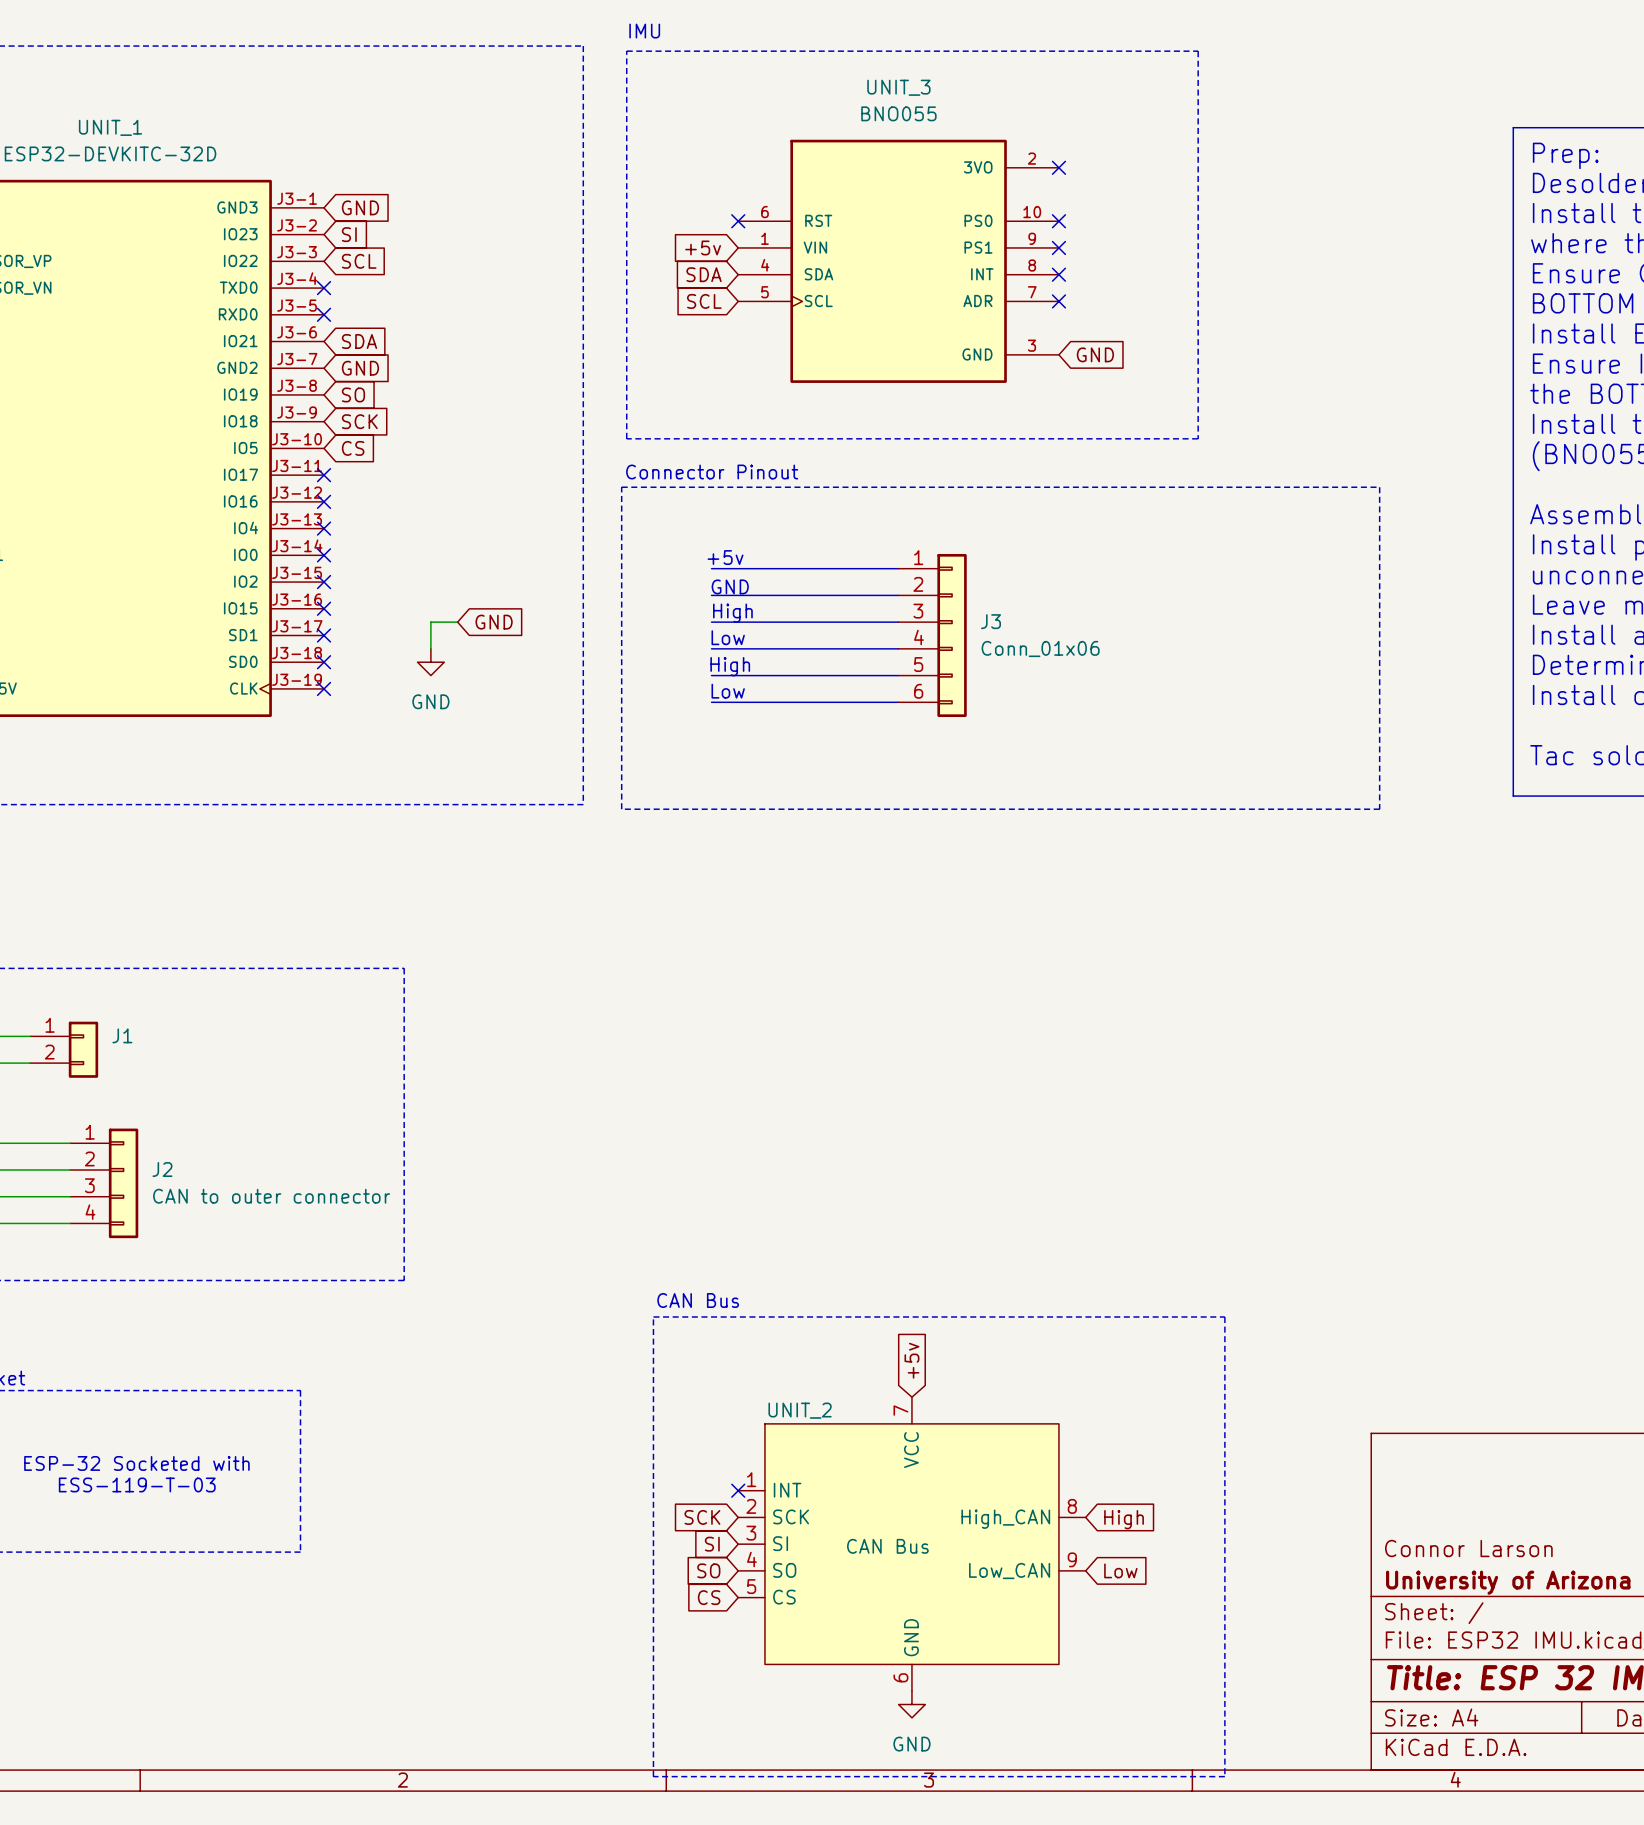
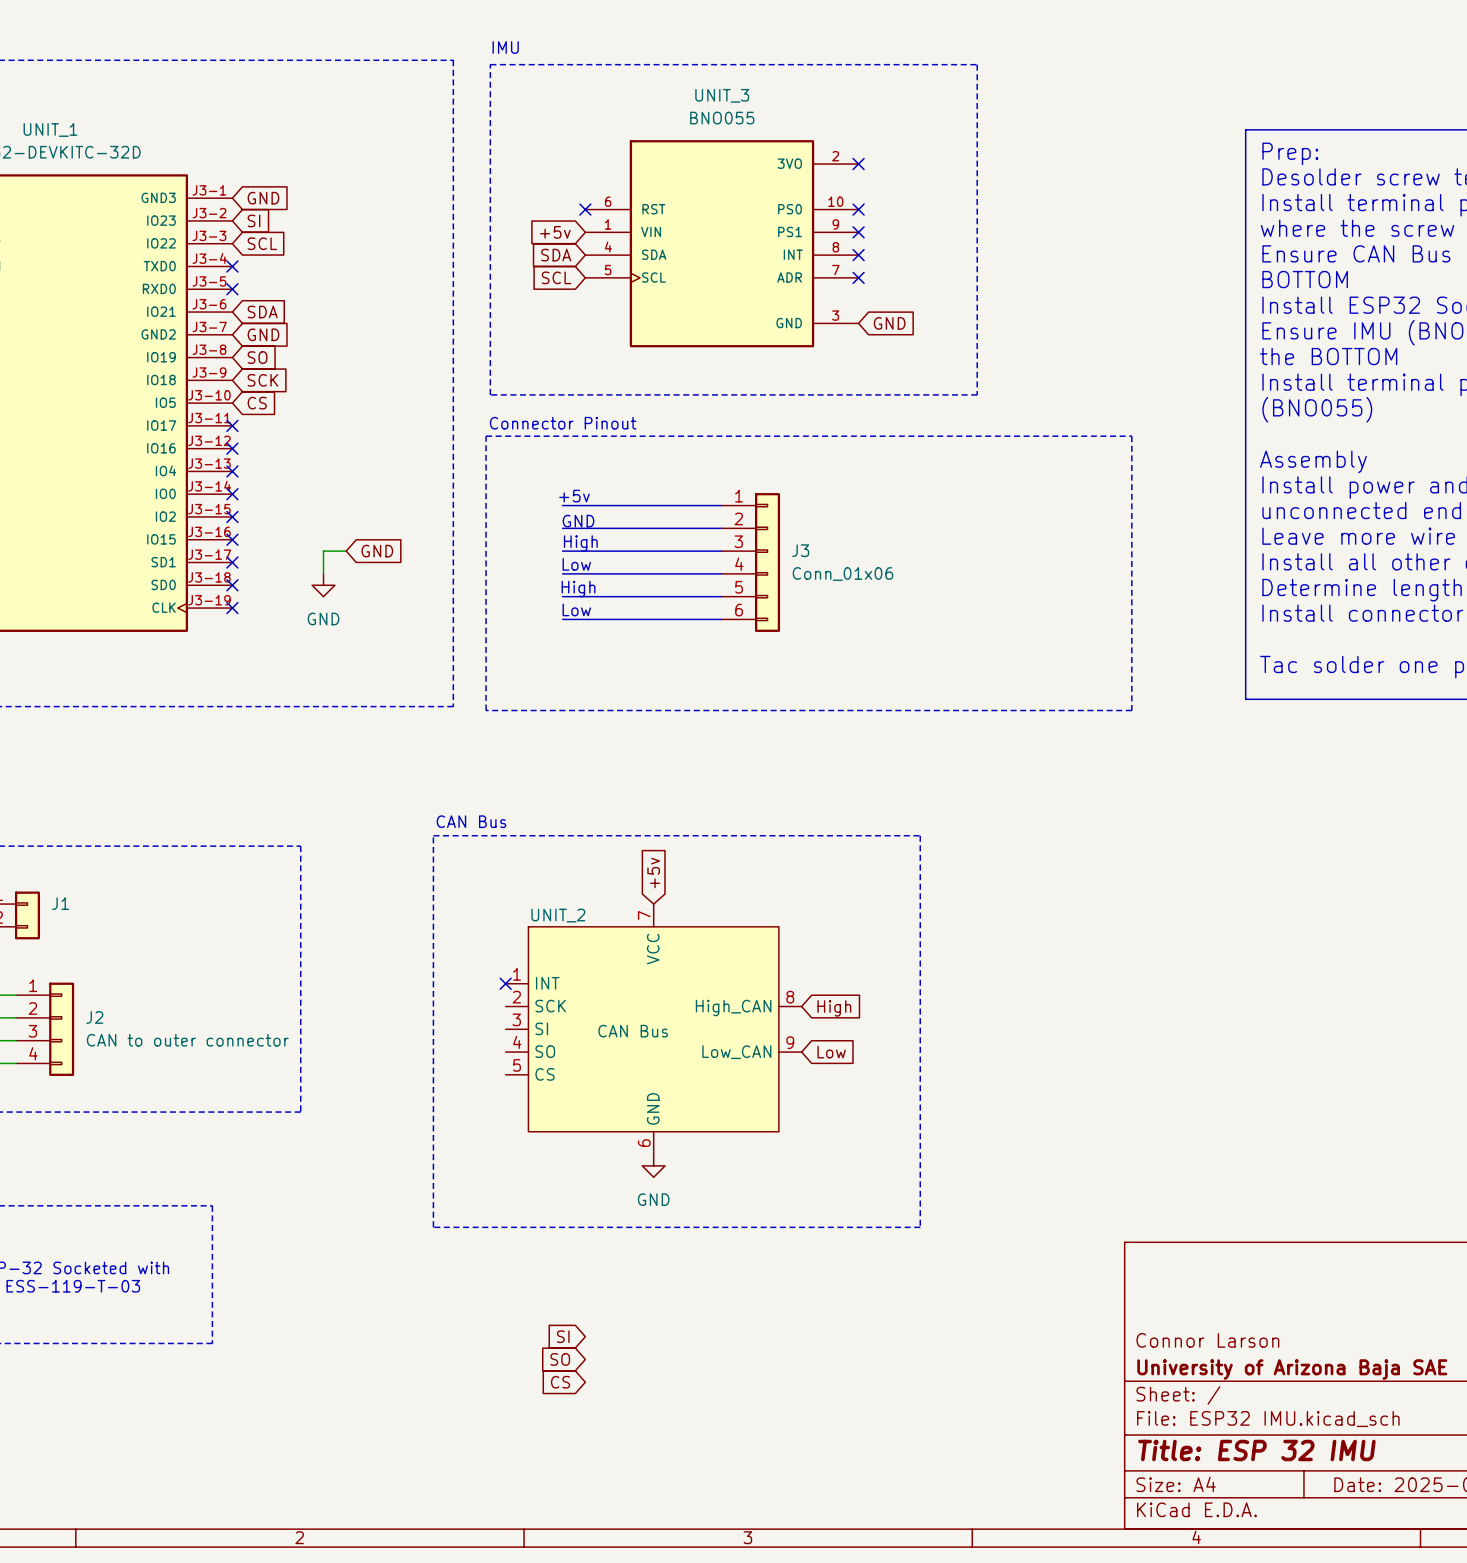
text: none -> CAN Bus (471, 821)
line: none -> (433, 835) (920, 835) (920, 1227) (433, 1227) (433, 835)
global label: none -> +5v (653, 873)
no-connect mark: none -> (505, 983)
global label: none -> High (834, 1008)
global label: none -> Low (831, 1052)
text: CAN Bus (698, 1300) -> none
line: (653, 1316) (1224, 1316) (1224, 1776) (653, 1776) (653, 1316) -> none
power symbol: none -> GND (653, 1165)
global label: +5v (911, 1360) -> none
no-connect mark: (738, 1490) -> none
global label: SCK (702, 1517) -> none
global label: High (1124, 1519) -> none
UNIT_2 position: (911, 1544) -> (653, 1029)
global label: Low (1120, 1570) -> none
power symbol: GND (911, 1704) -> none

